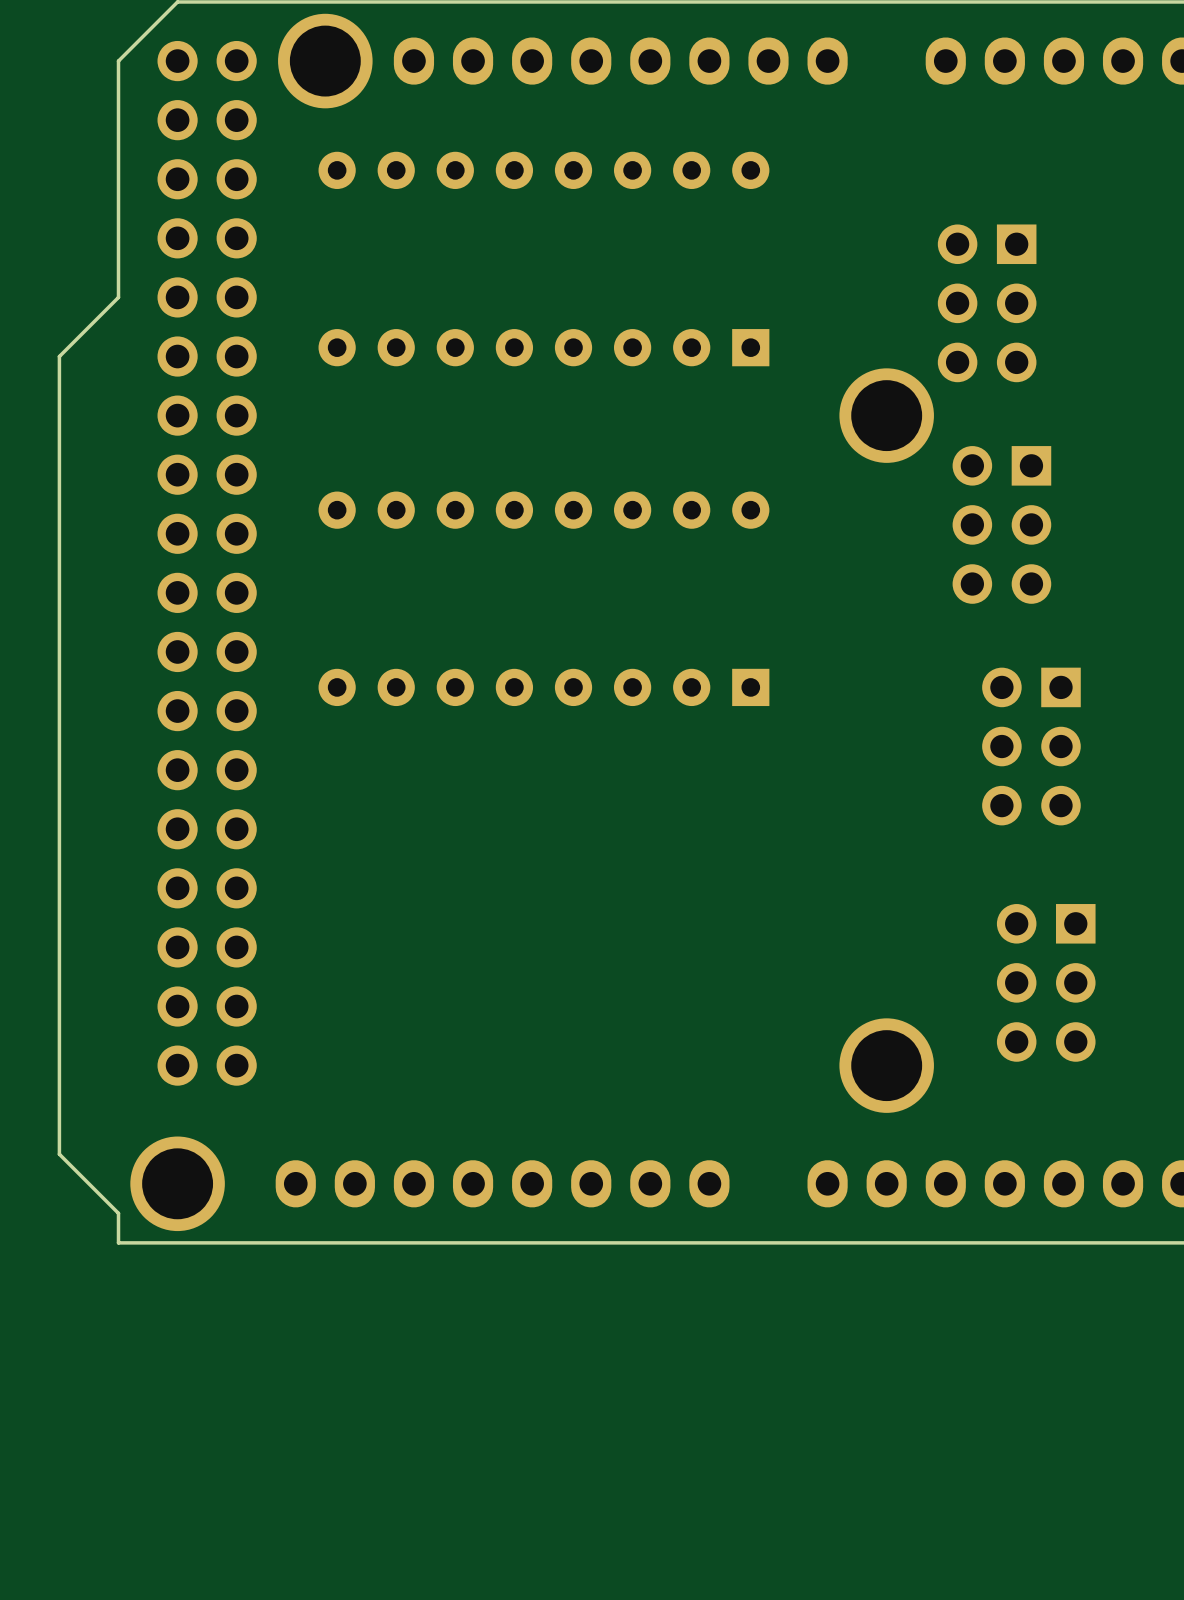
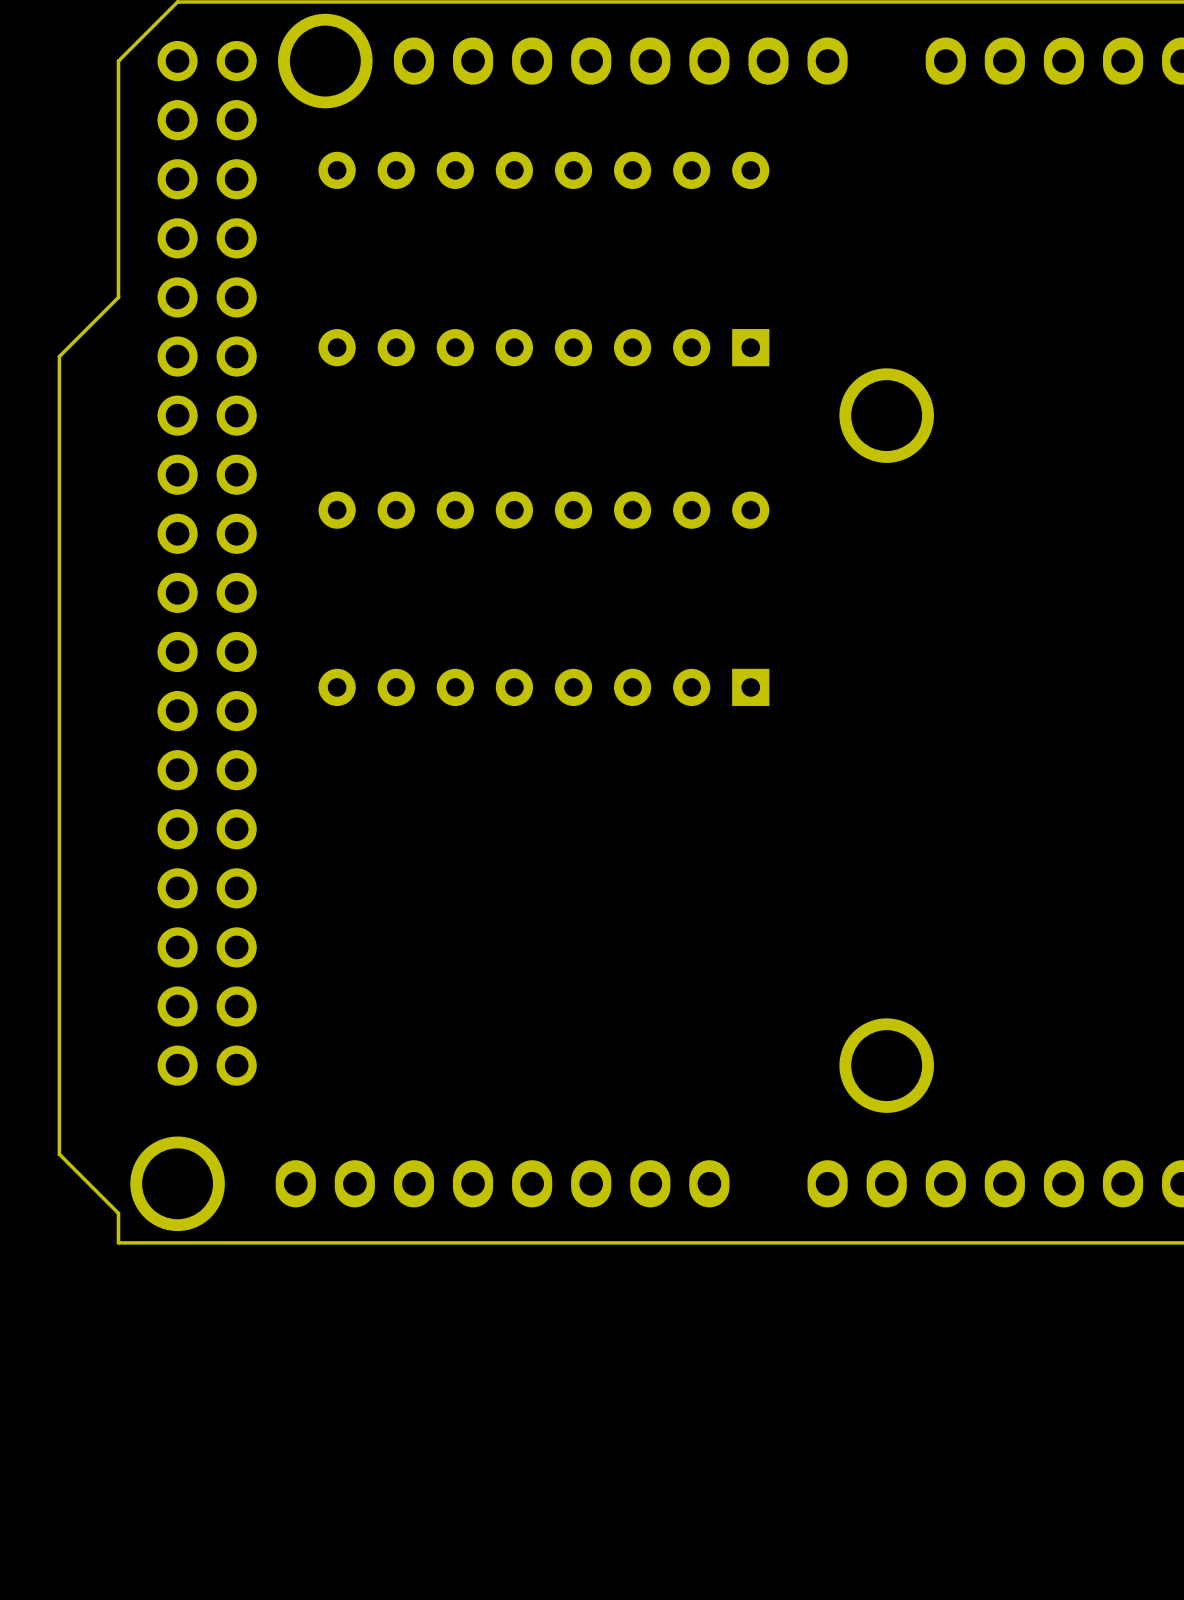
part: (987, 303) -> none
part: (1001, 524) -> none
part: (1031, 746) -> none
part: (1046, 982) -> none

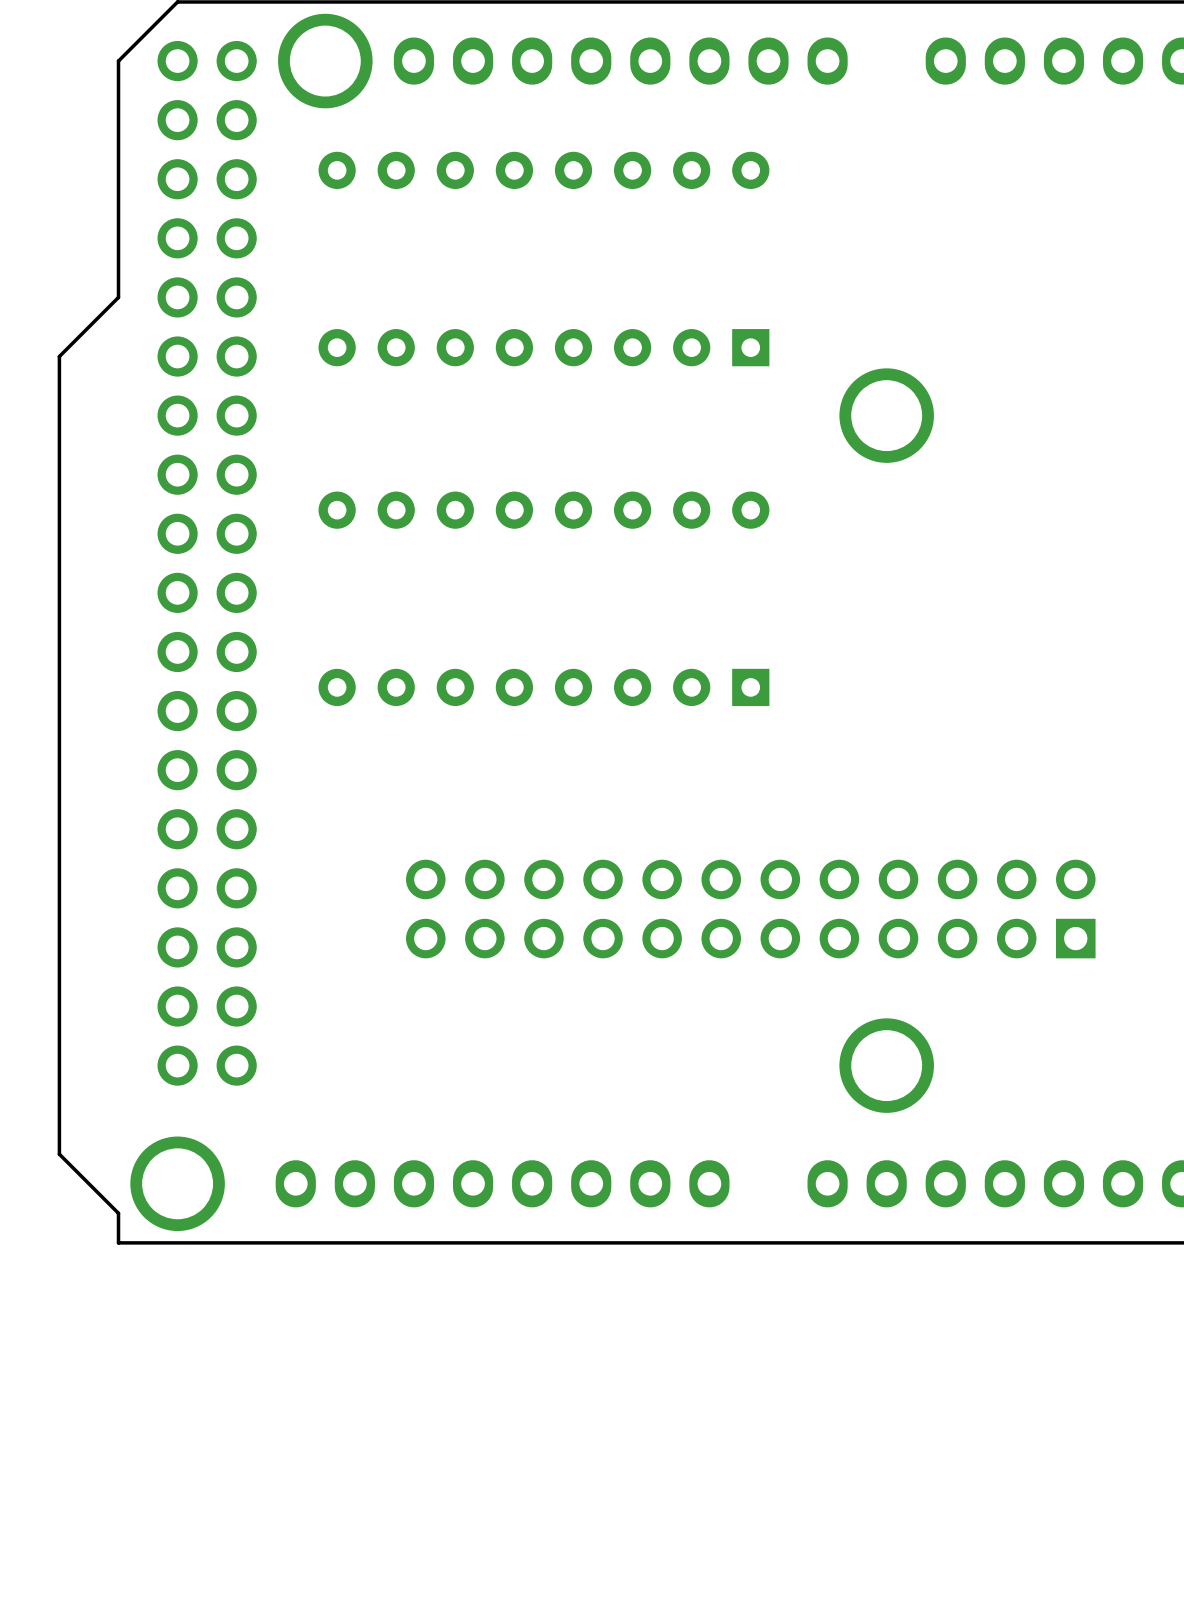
part: none -> (750, 909)

